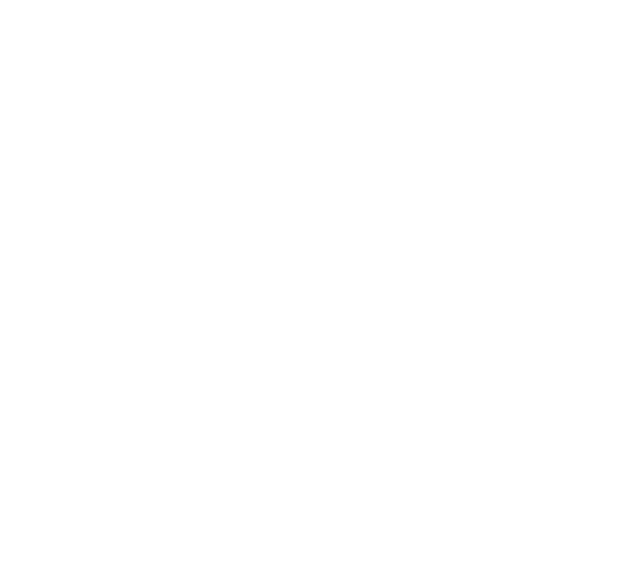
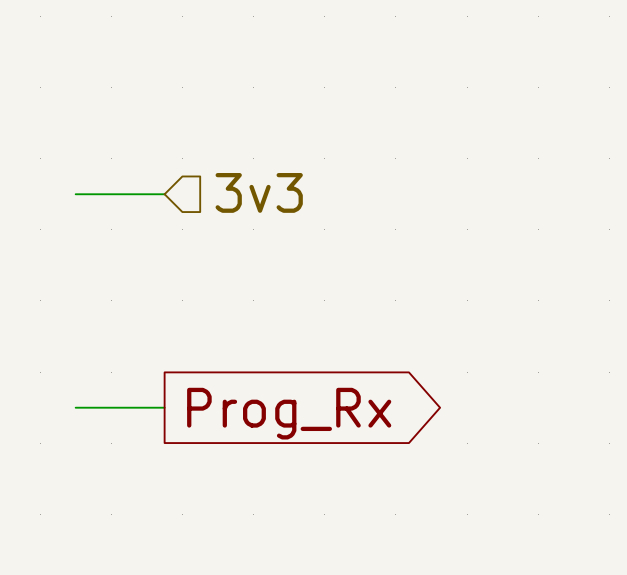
hierarchical label: none -> 3v3 (259, 192)
wire: none -> (75, 194) (164, 194)
wire: none -> (75, 407) (164, 407)
global label: none -> Prog_Rx (289, 413)

